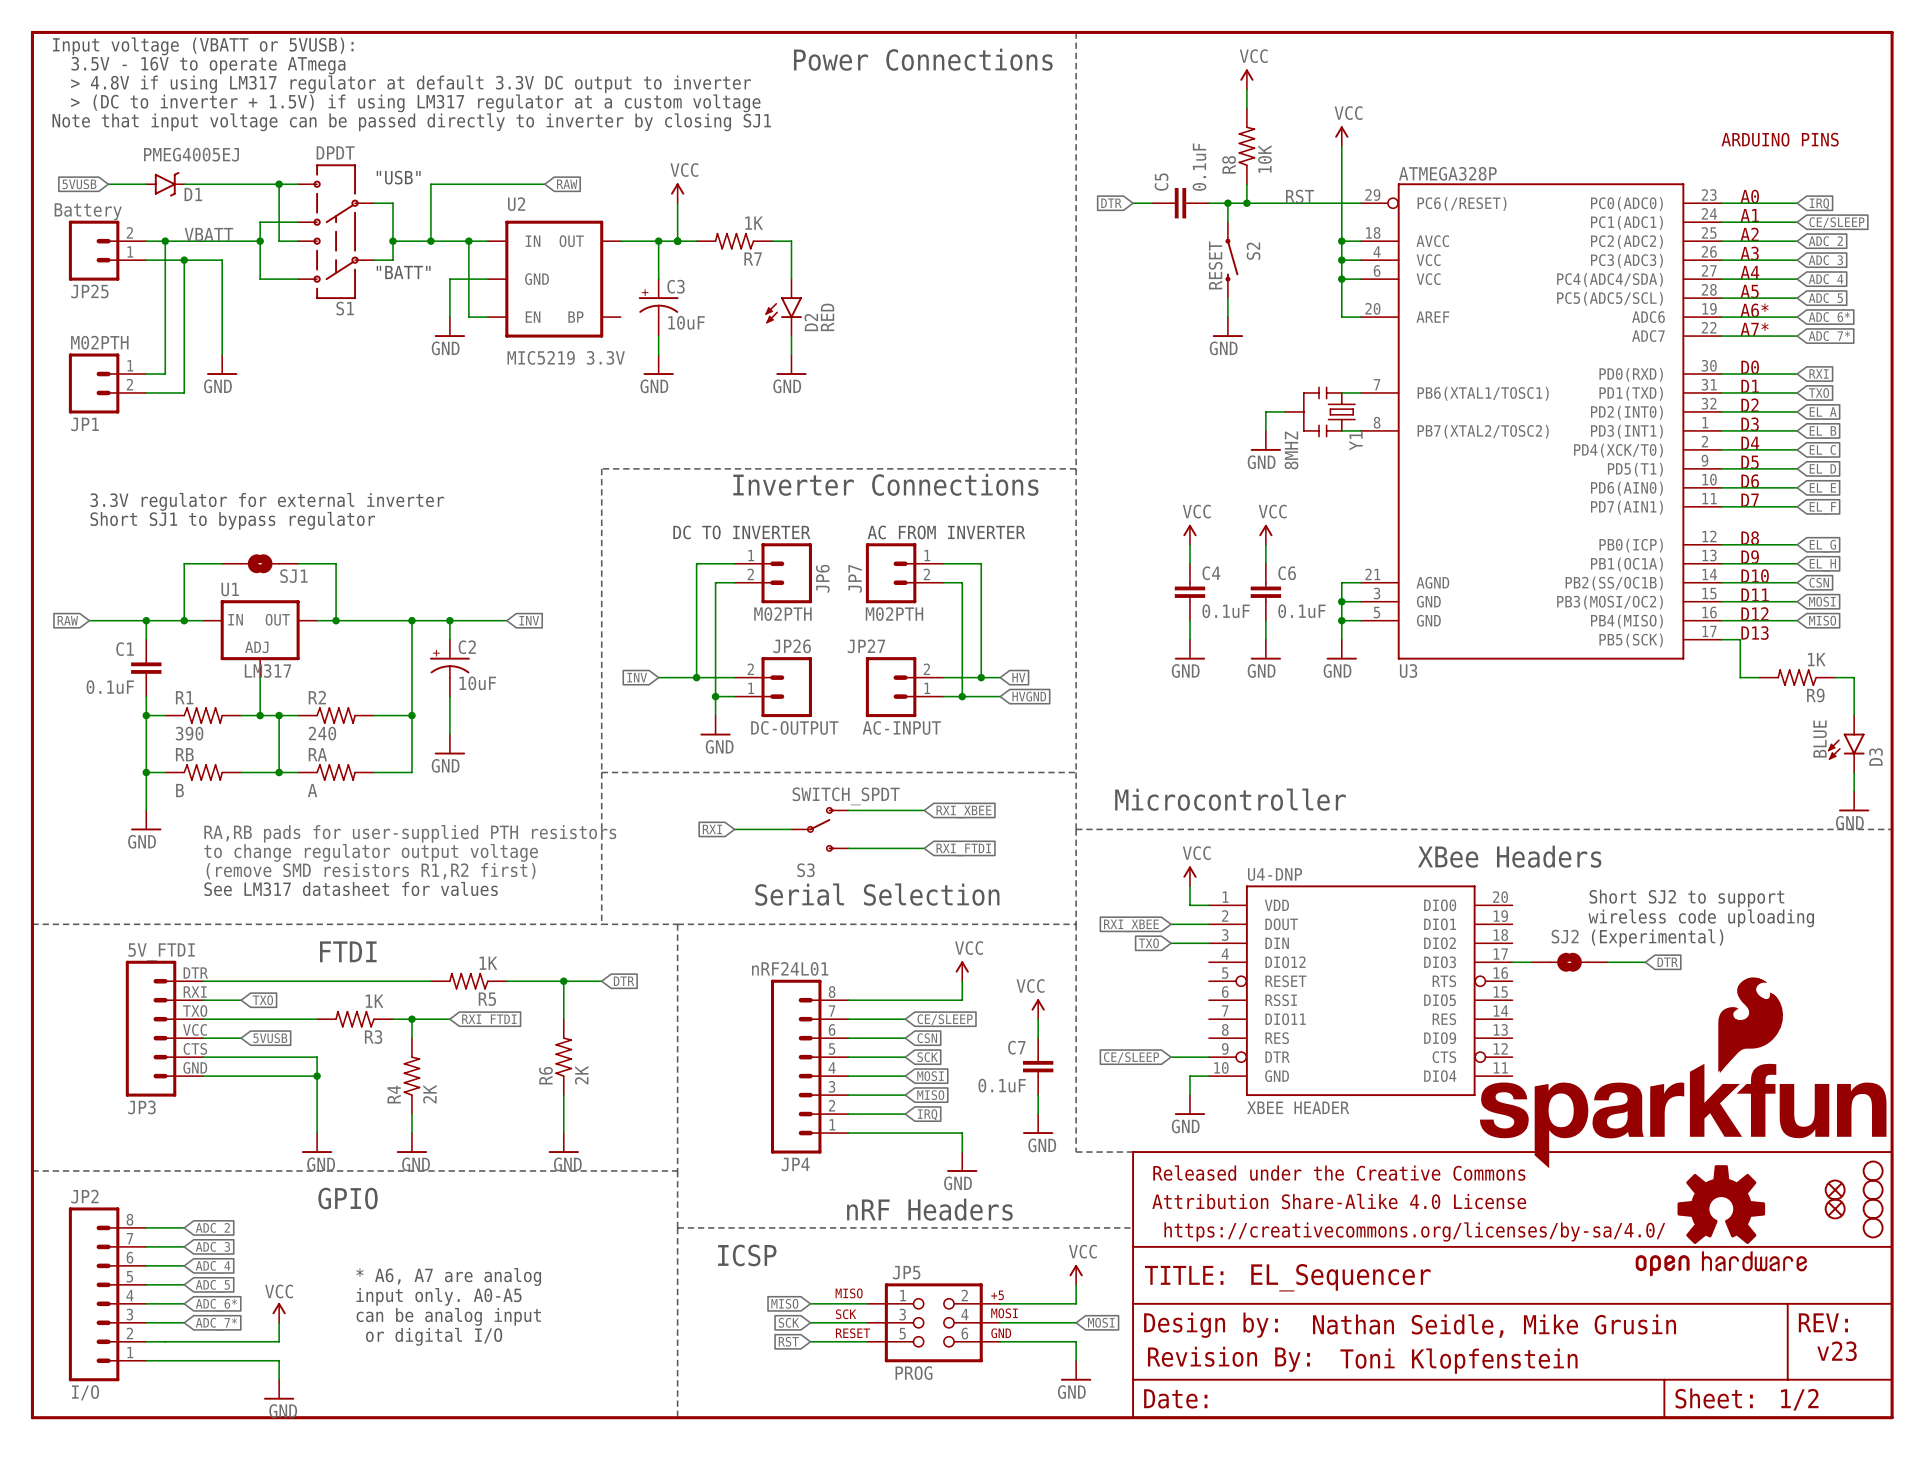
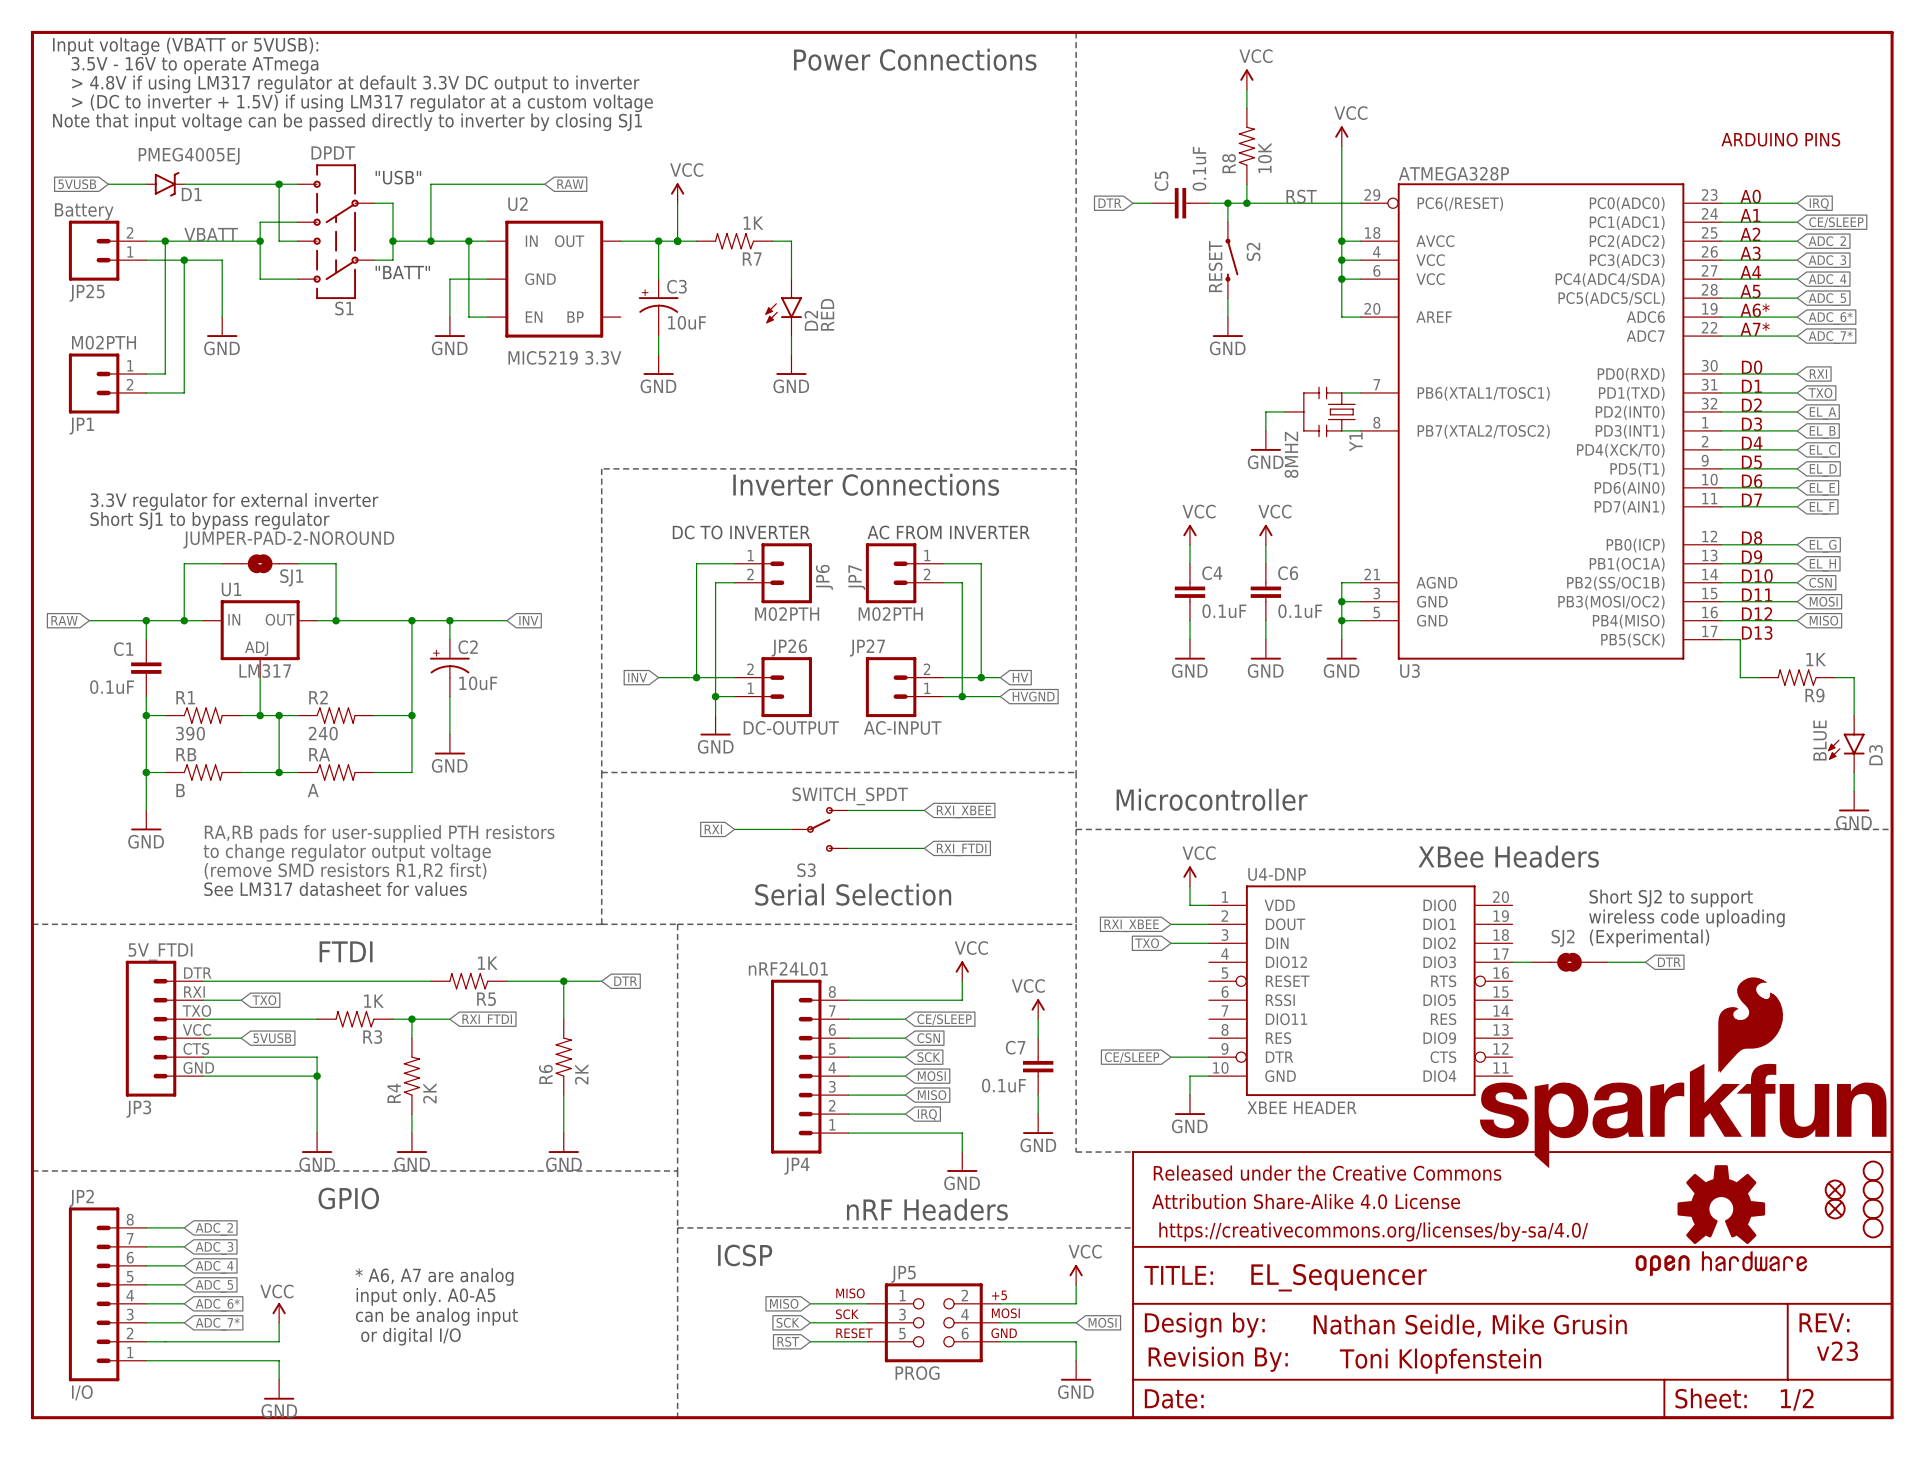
power symbol position: GND (222, 364) -> GND (222, 327)
SJ1 value: none -> JUMPER-PAD-2-NOROUND (288, 539)

